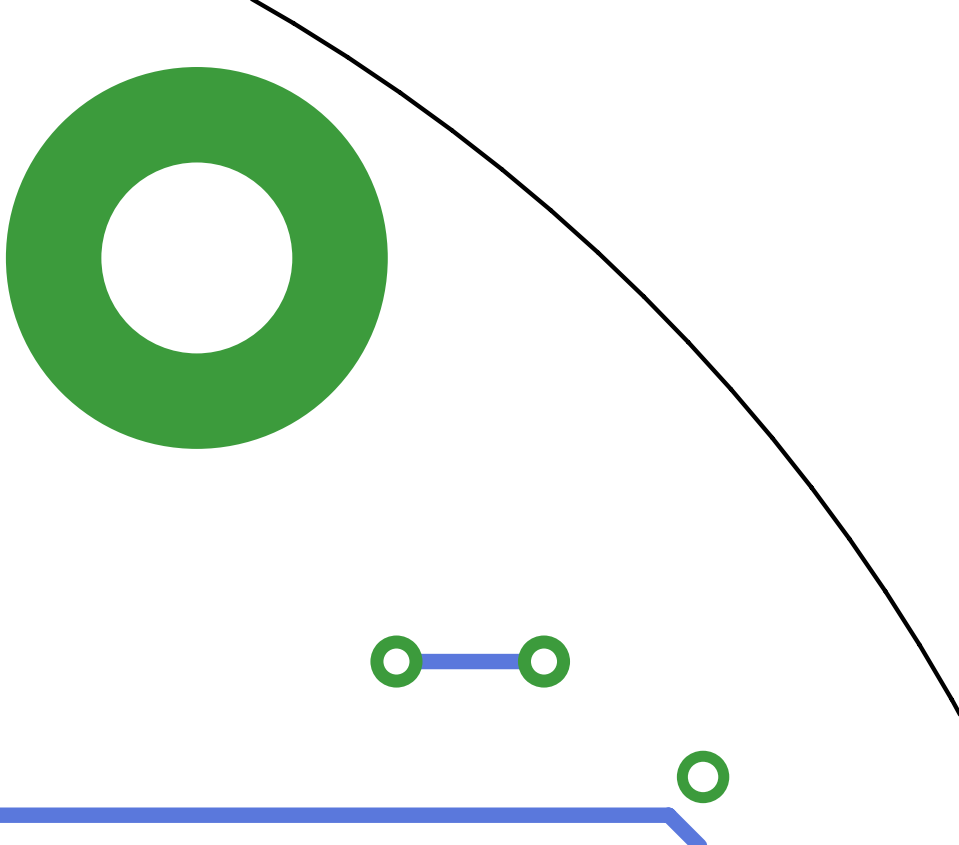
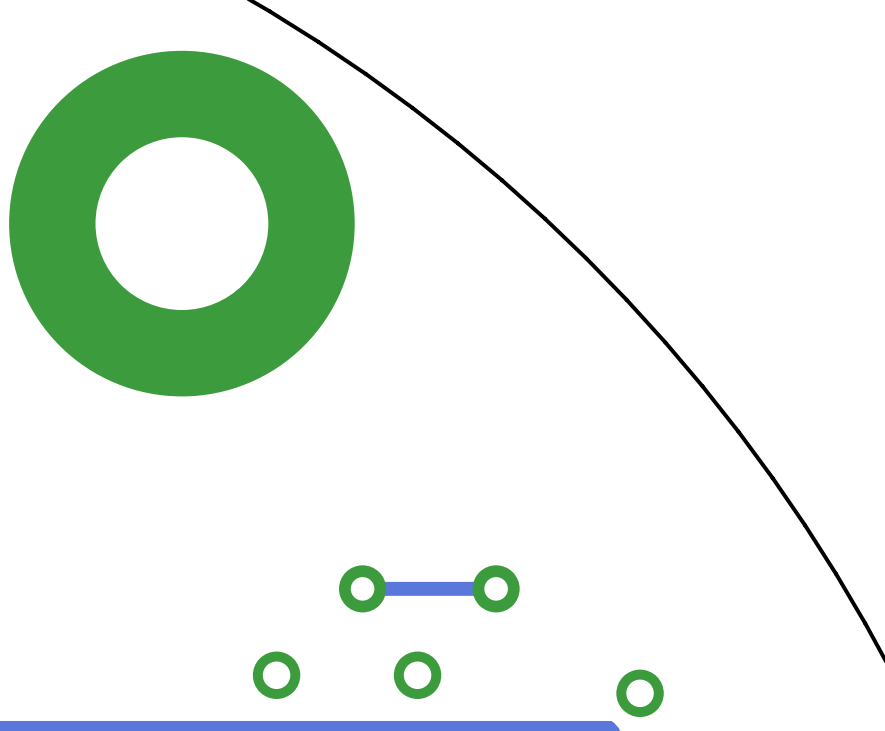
via: none -> (276, 675)
via: none -> (417, 675)

